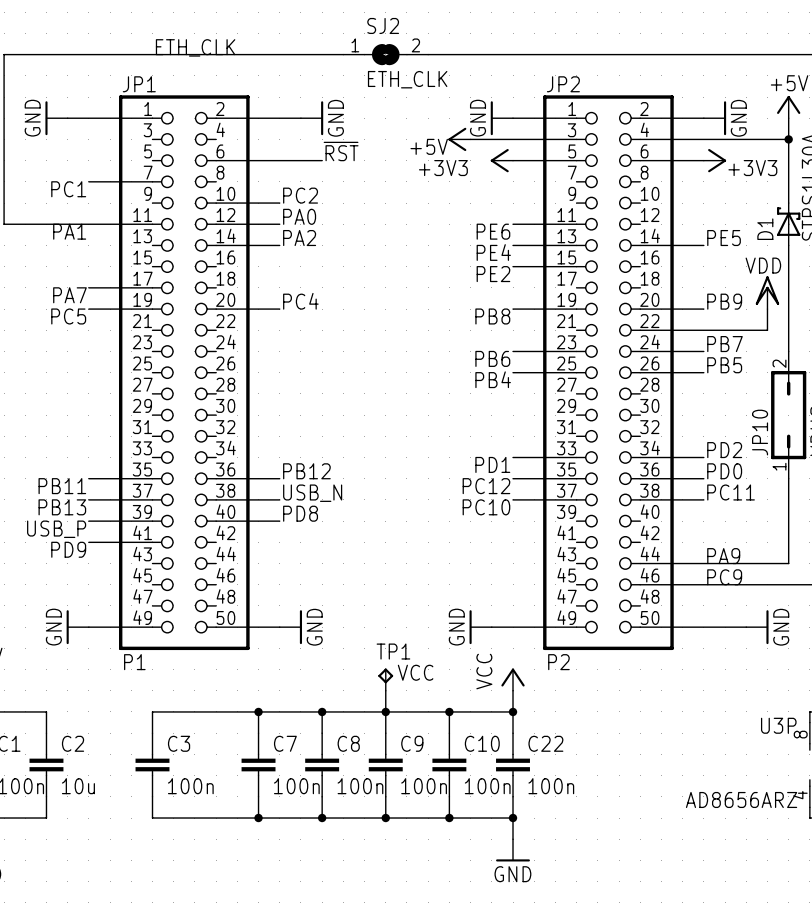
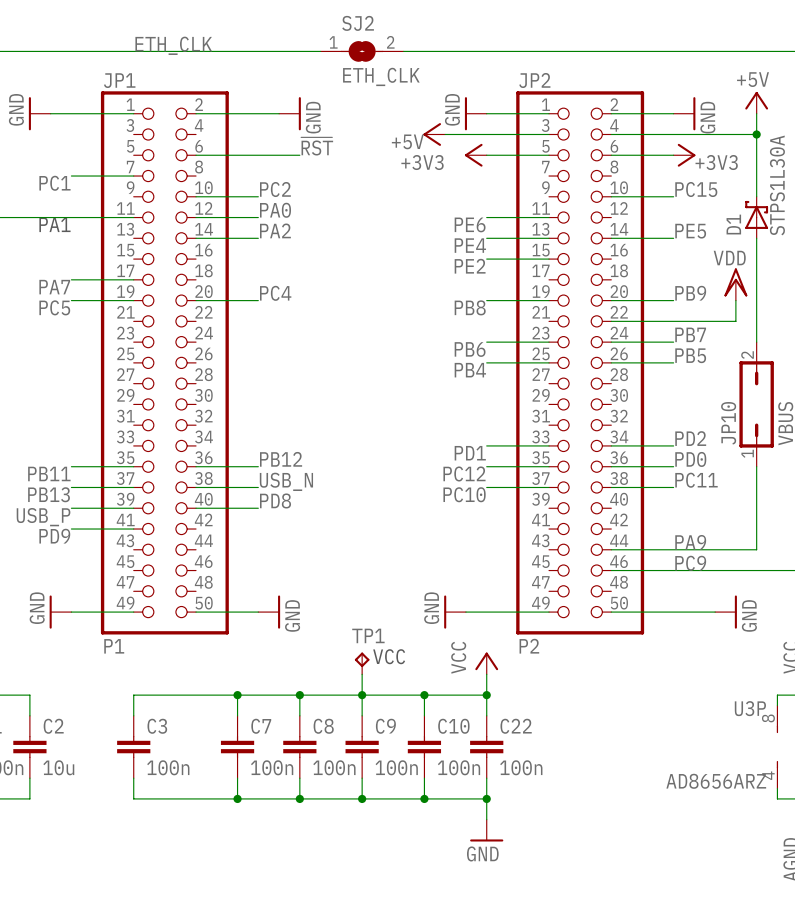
label: none -> PC15 (696, 189)
wire: none -> (611, 196) (673, 196)

